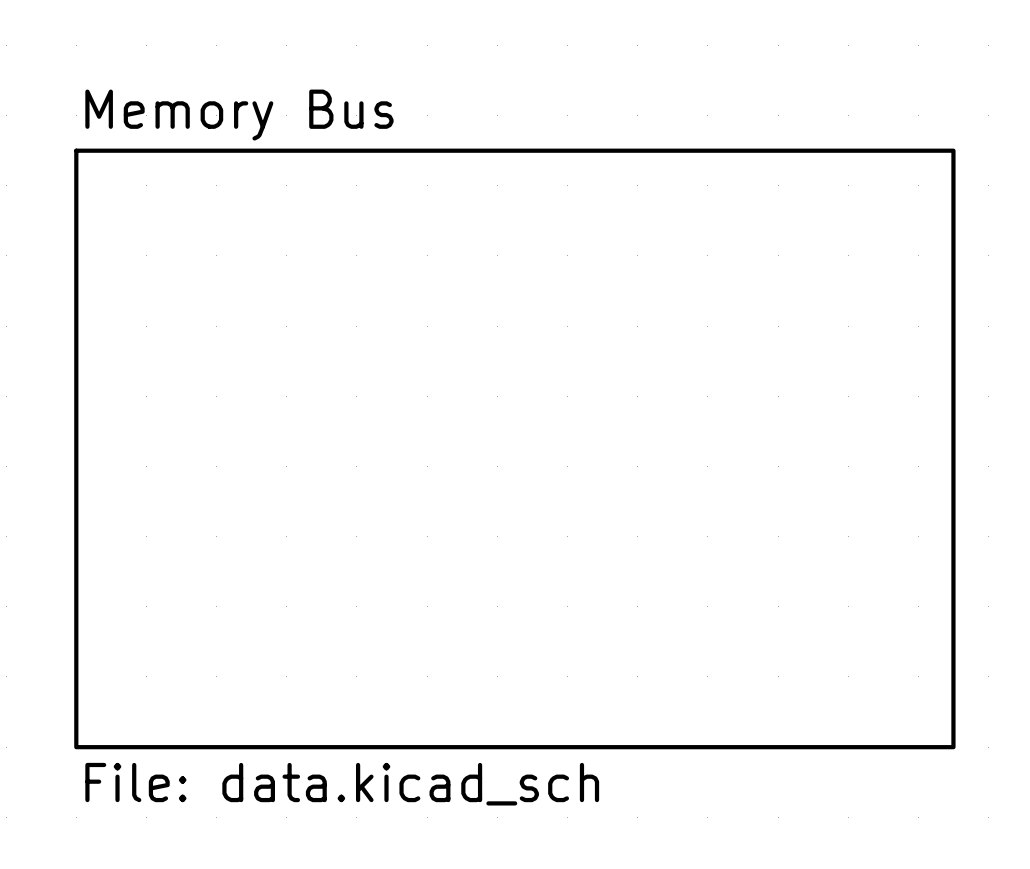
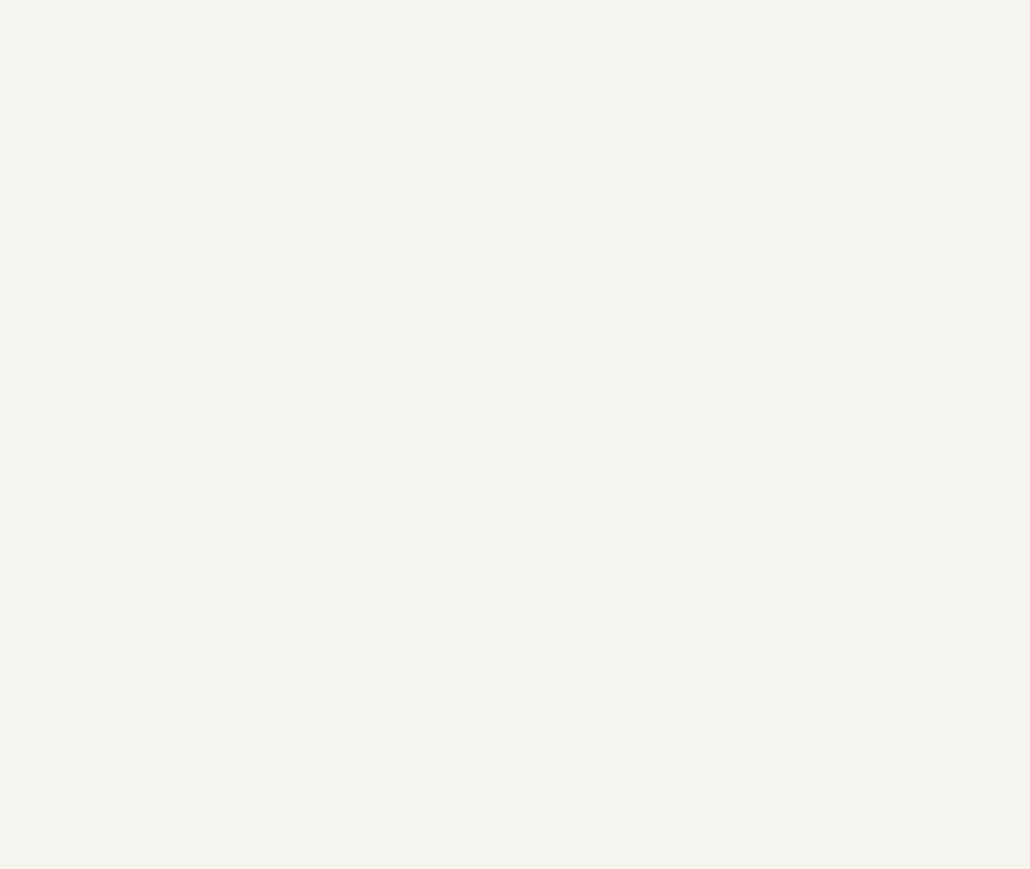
sheet Memory Bus: File: data.kicad_sch (514, 448) -> none

